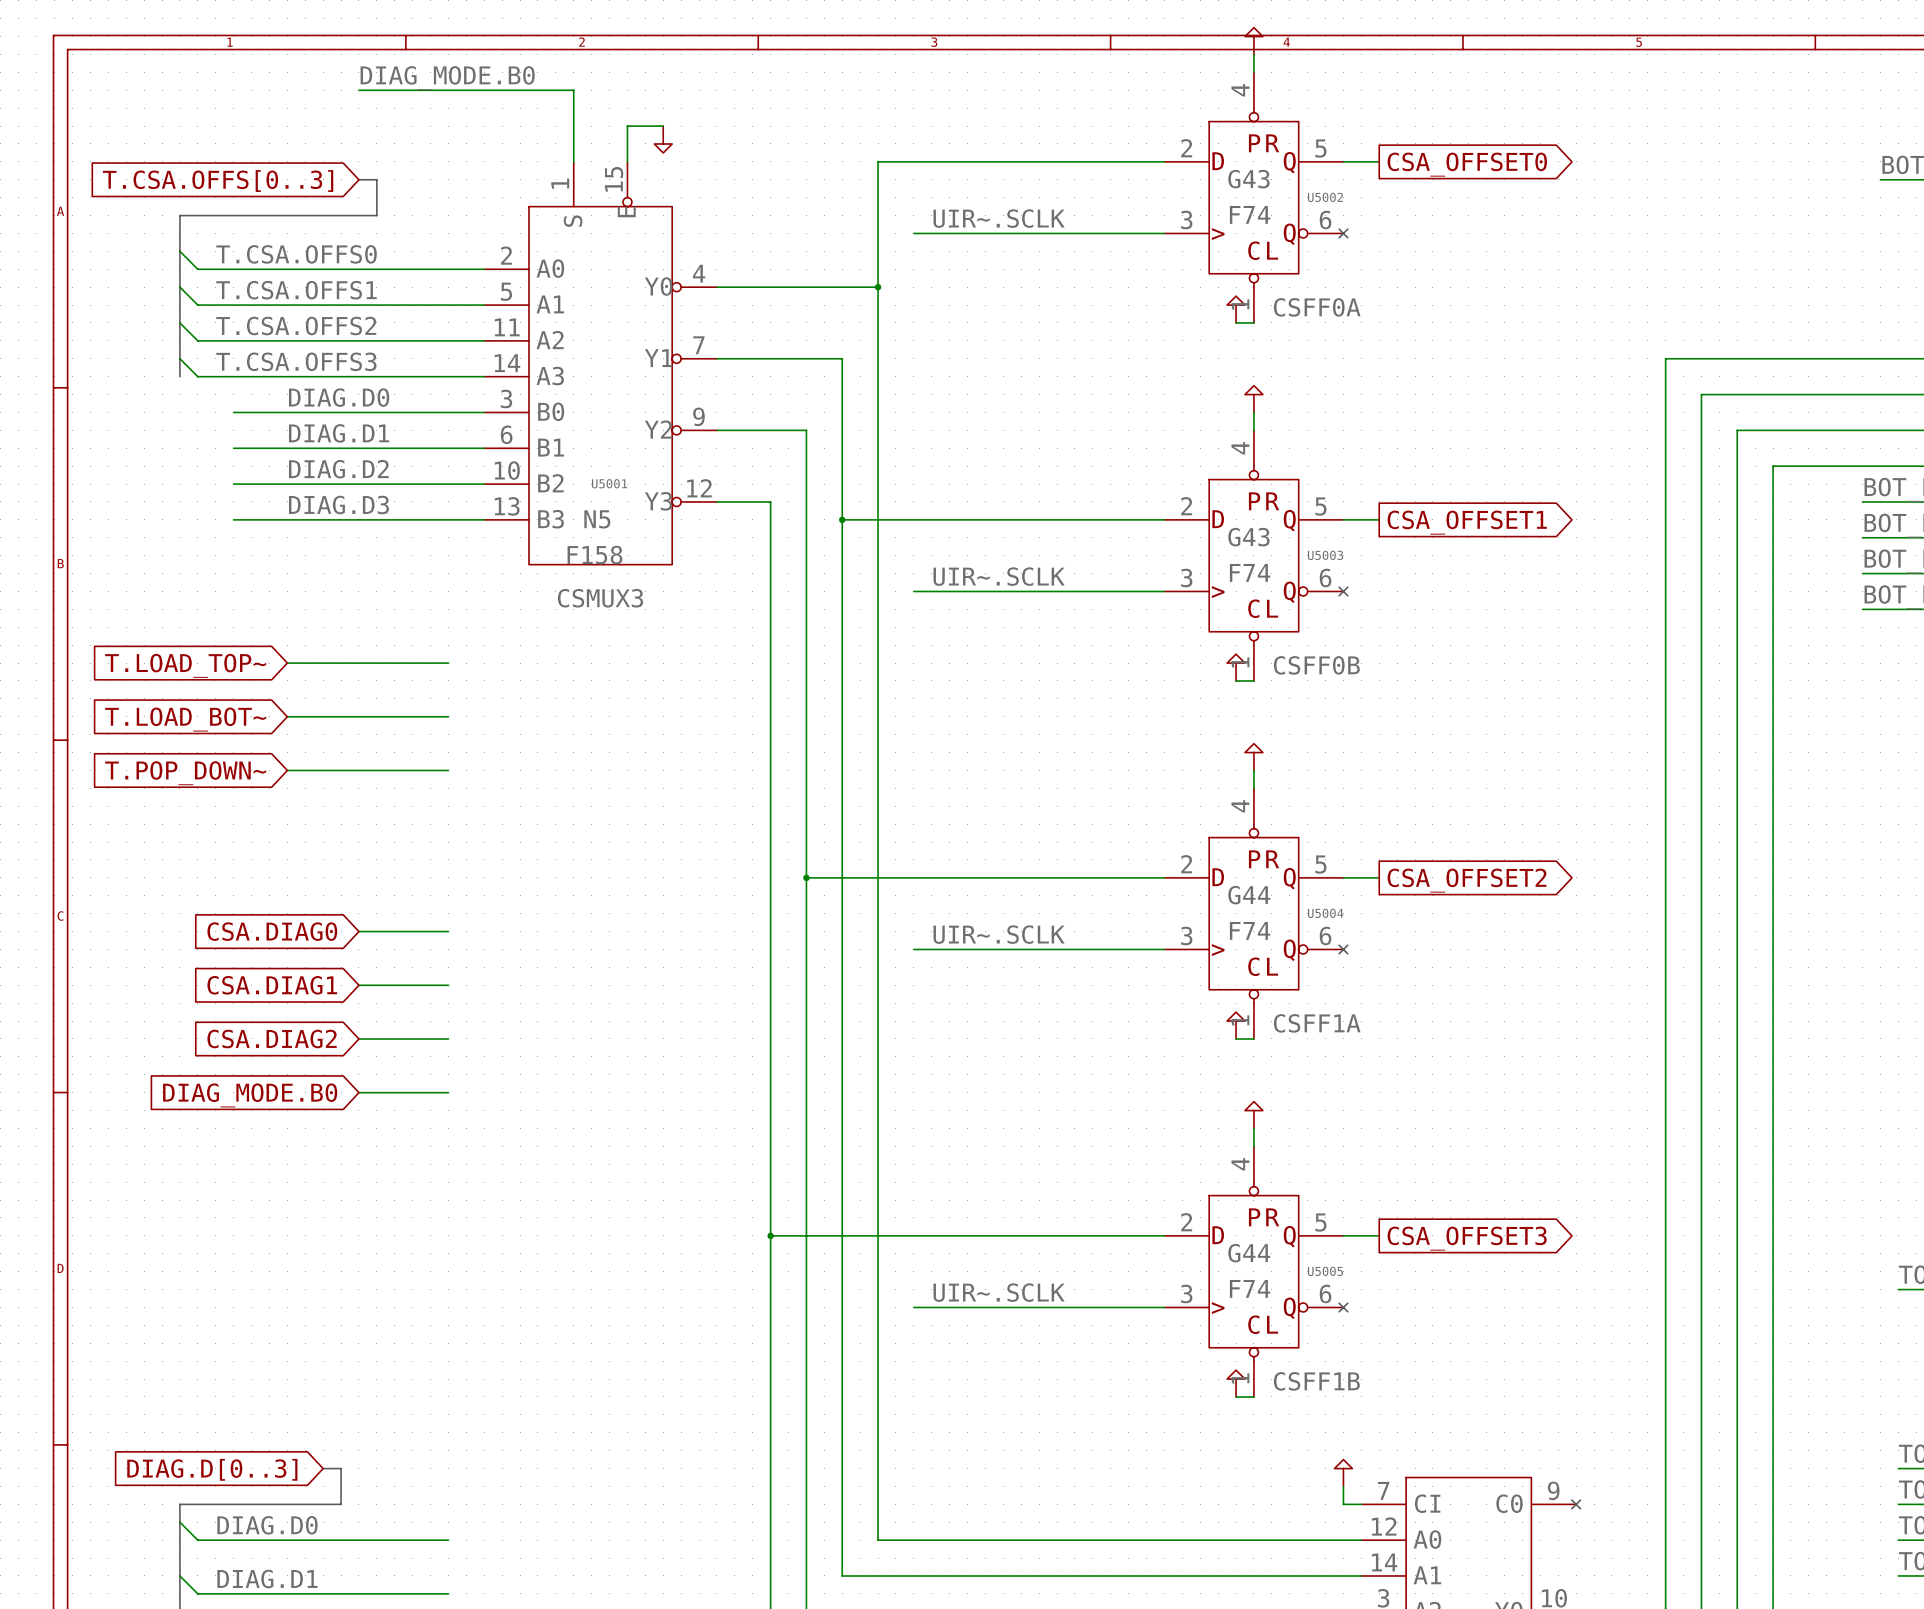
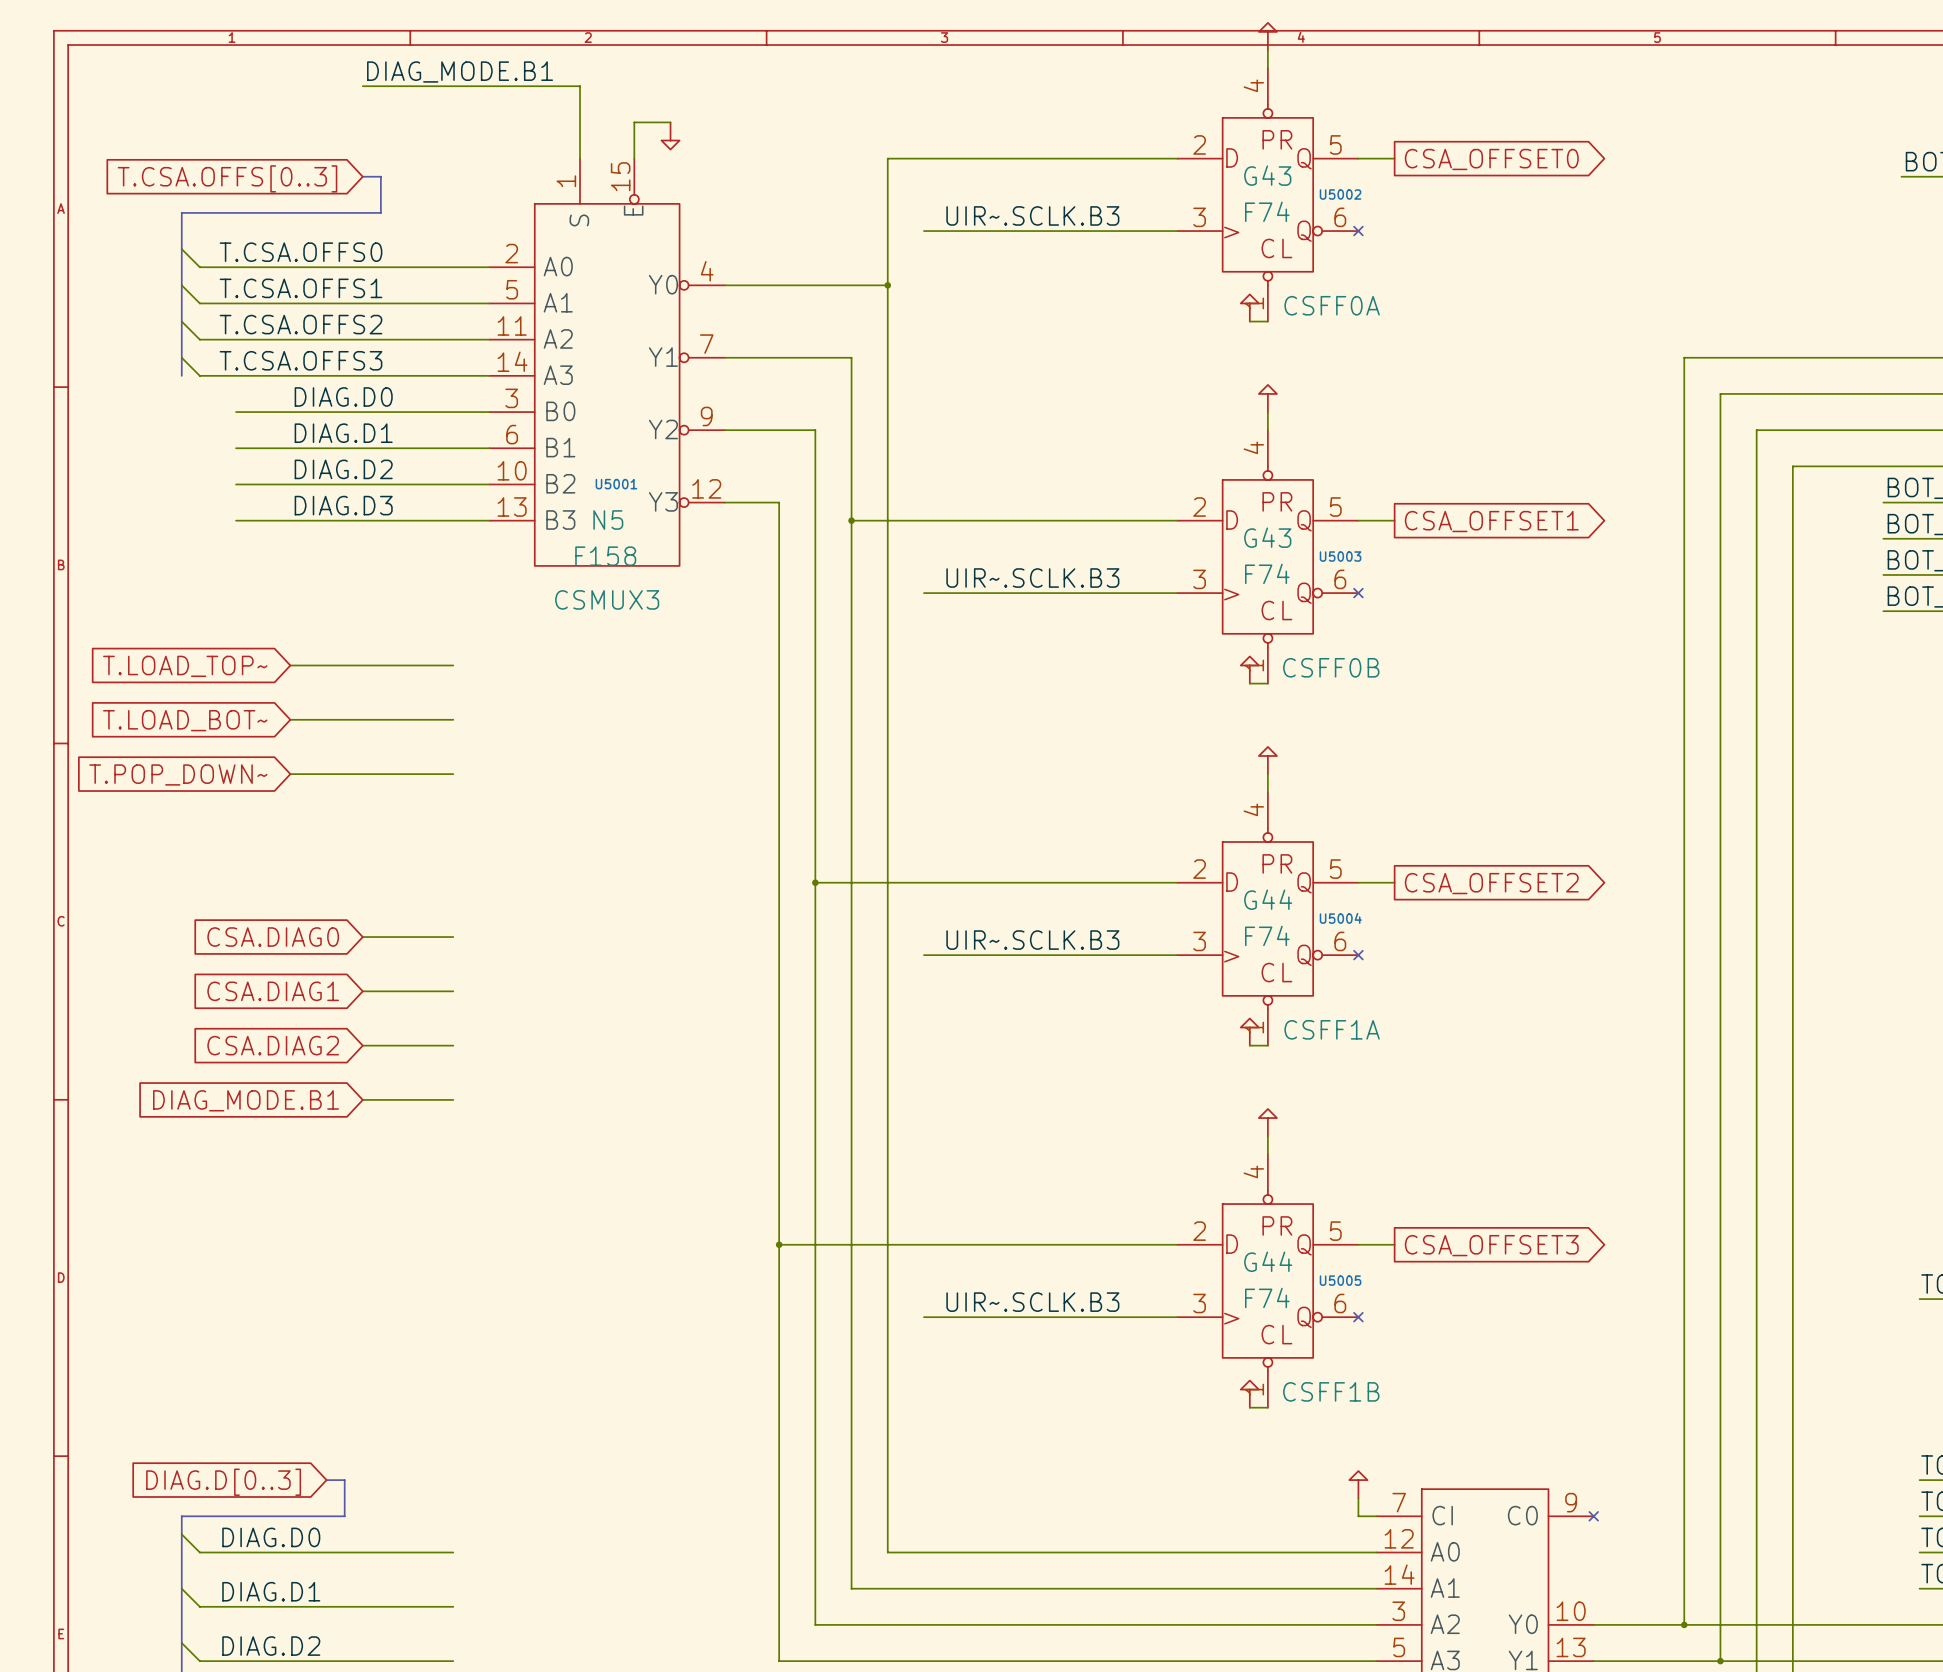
label: DIAG_MODE.B0 (447, 78) -> DIAG_MODE.B1 (460, 72)
label: UIR~.SCLK (999, 218) -> UIR~.SCLK.B3 (1032, 215)
label: UIR~.SCLK (999, 576) -> UIR~.SCLK.B3 (1032, 578)
label: UIR~.SCLK (999, 934) -> UIR~.SCLK.B3 (1032, 940)
global label: DIAG_MODE.B0 (250, 1095) -> DIAG_MODE.B1 (246, 1100)
label: UIR~.SCLK (999, 1292) -> UIR~.SCLK.B3 (1032, 1302)

